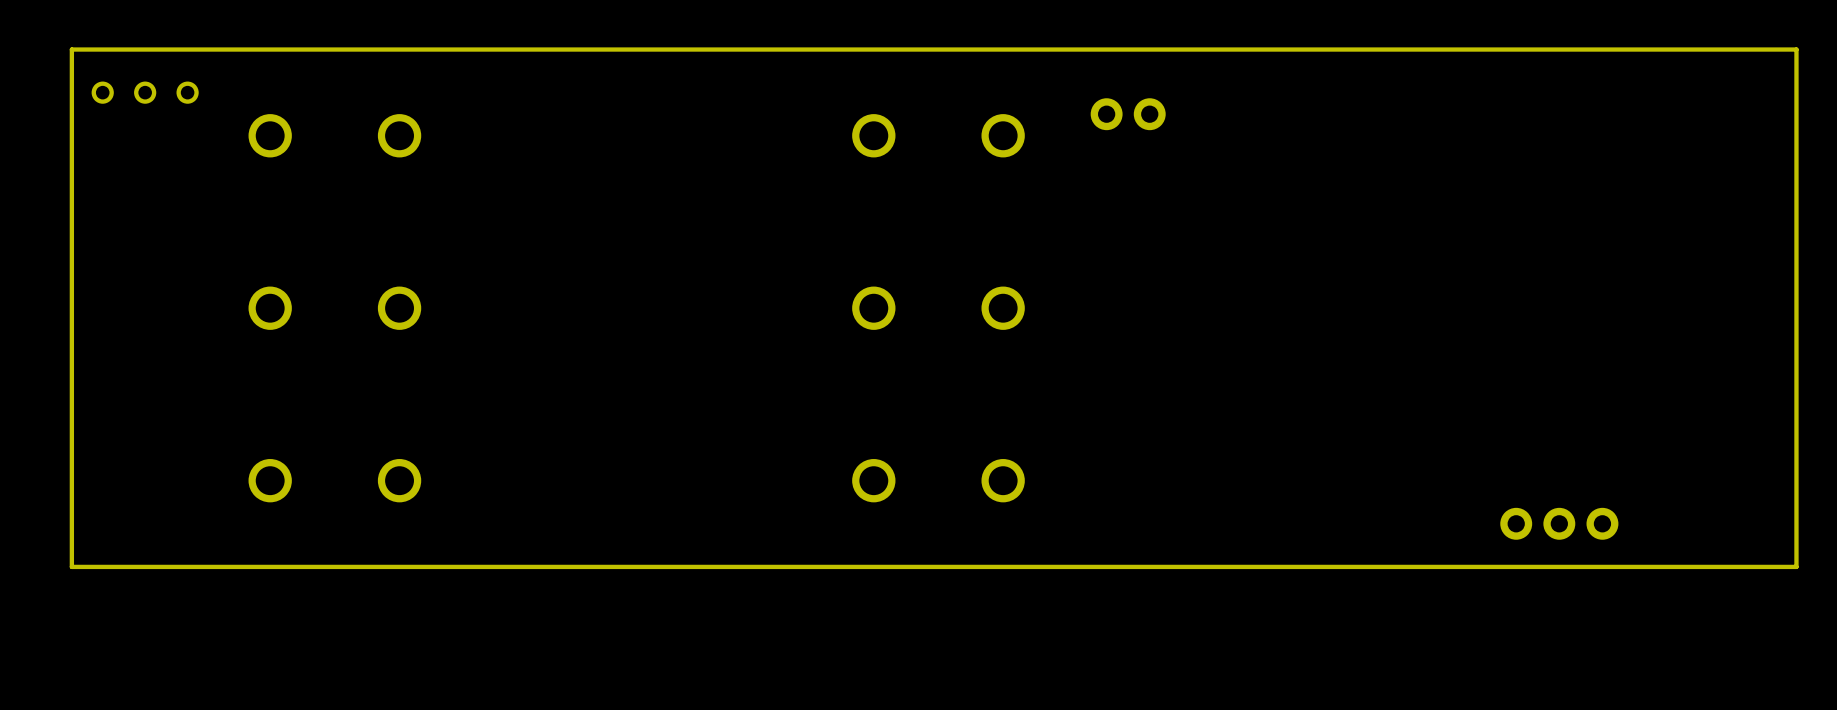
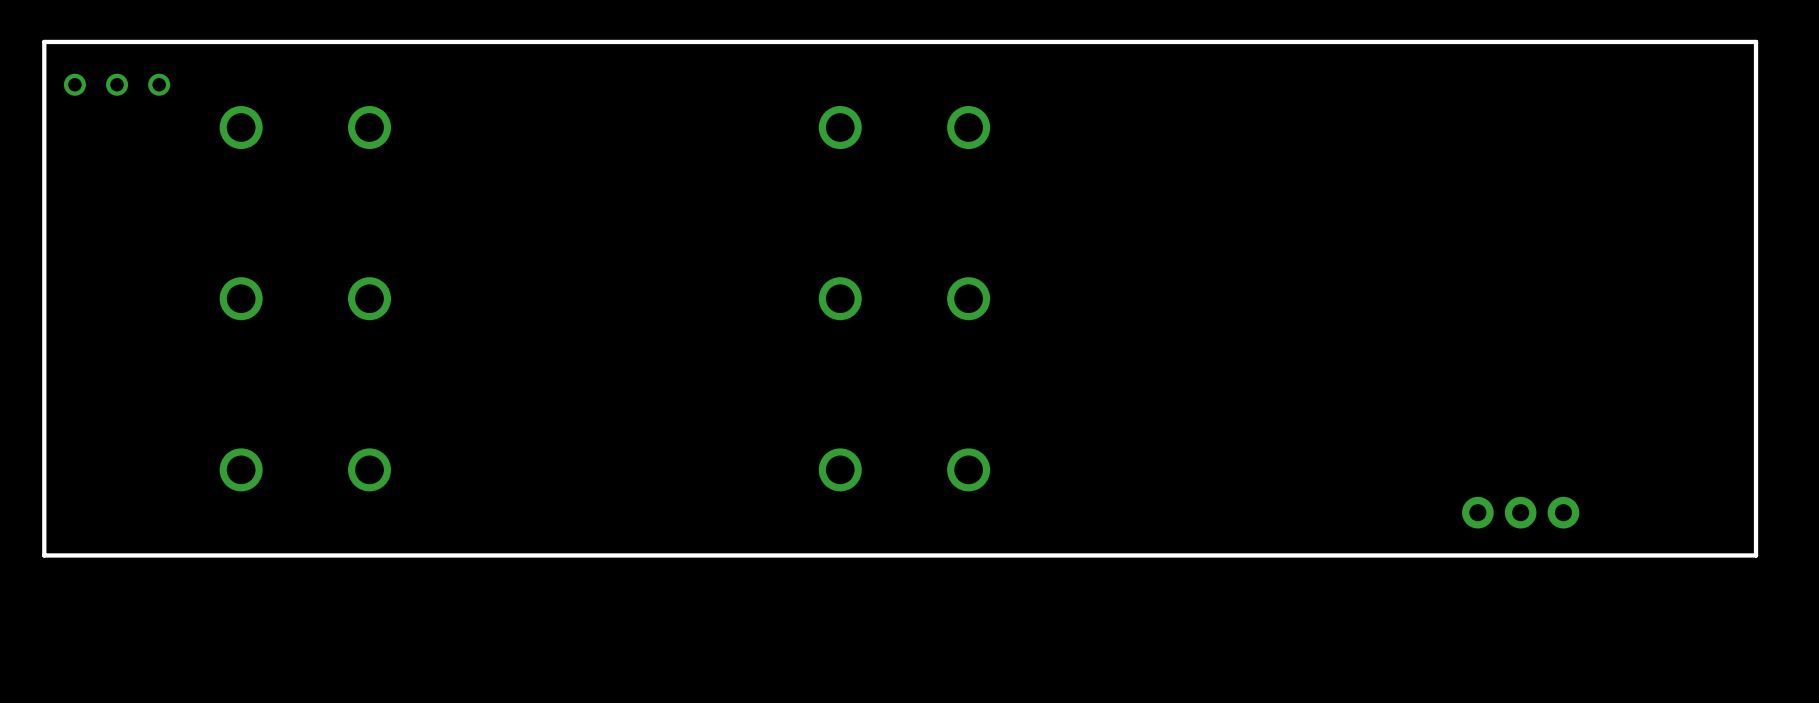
part: (1128, 114) -> none

